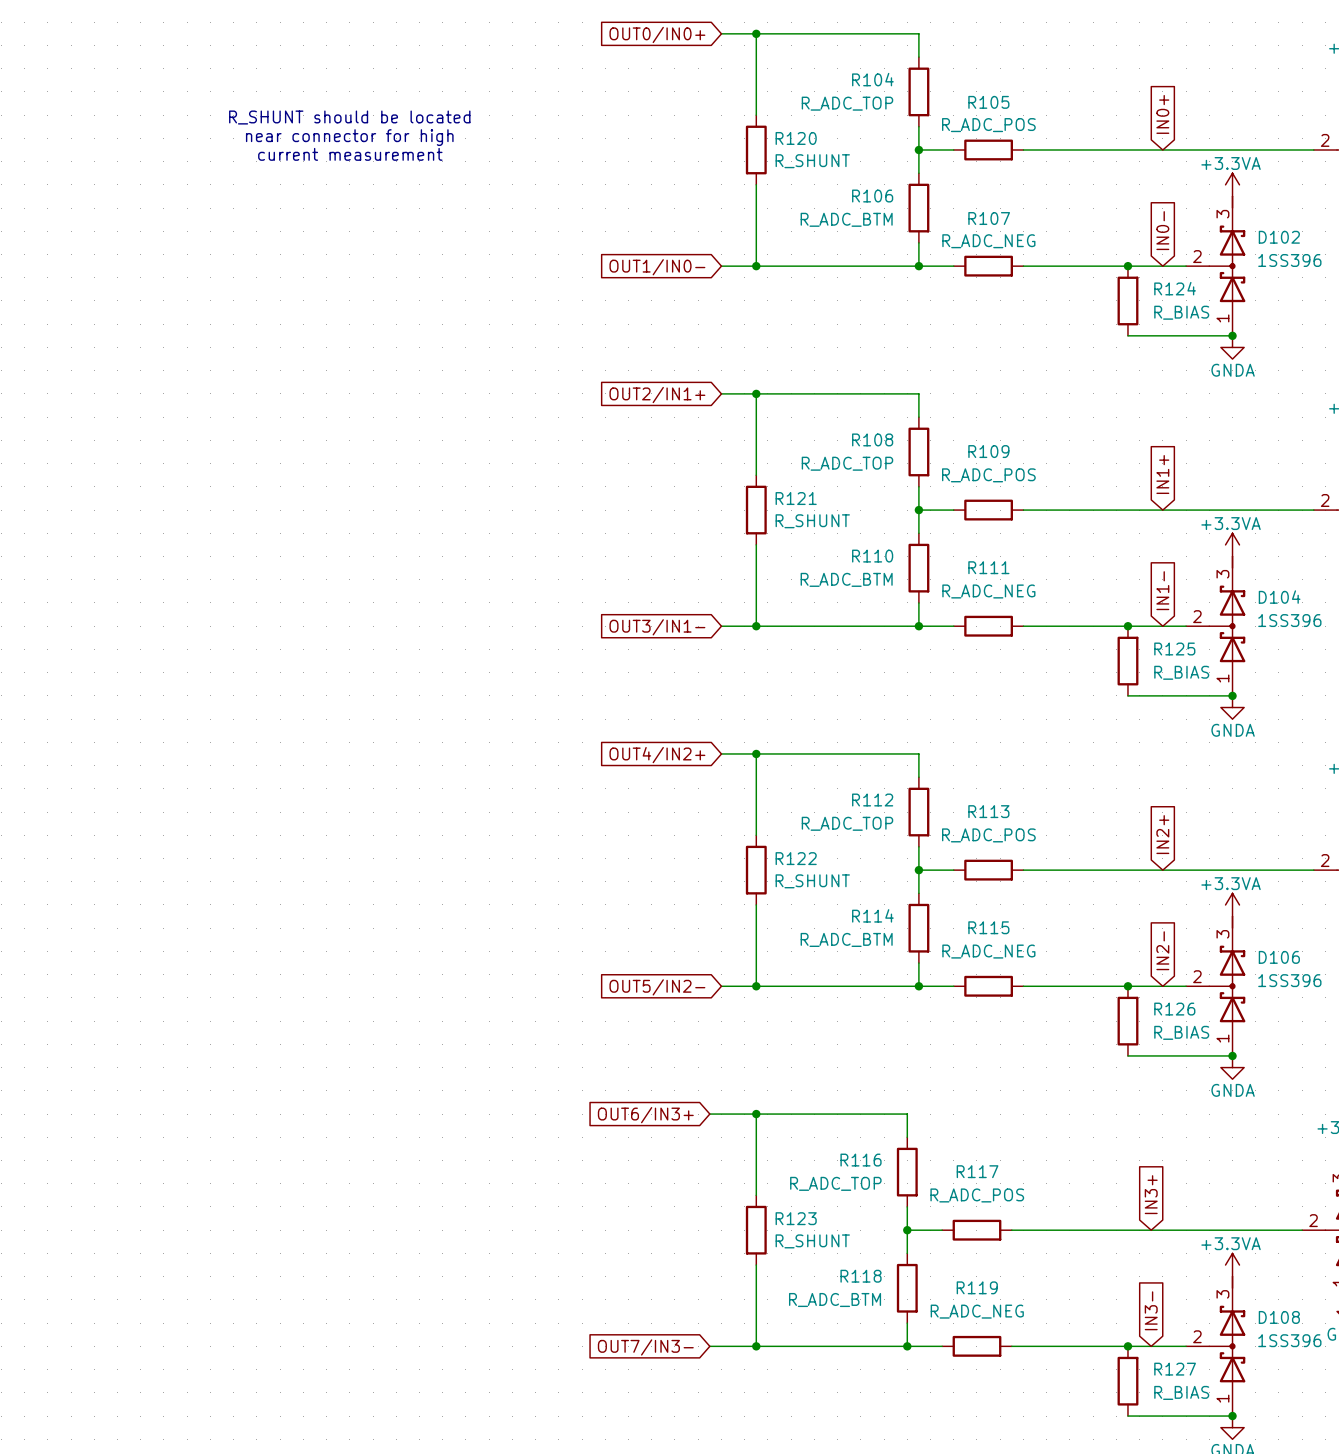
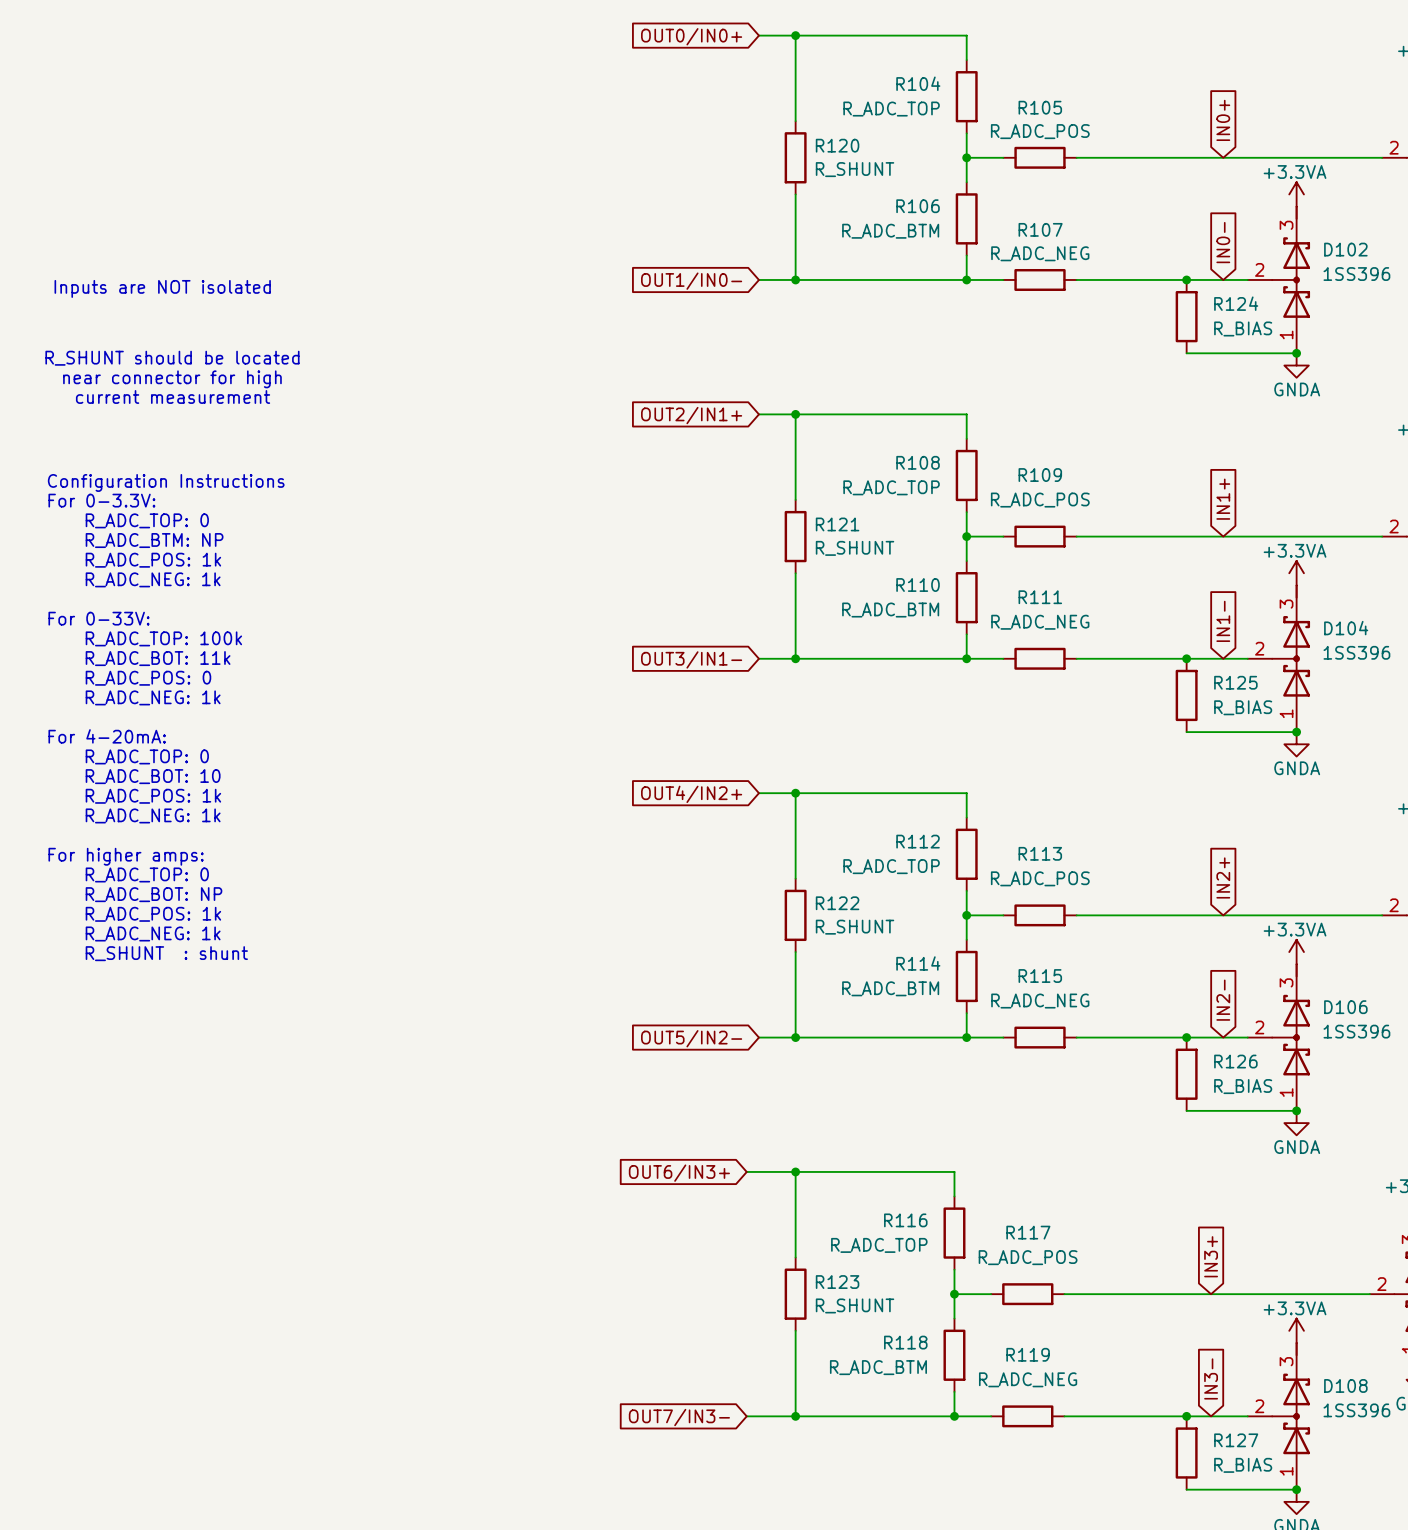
text: R_SHUNT should be located (349, 117) -> none
text: near connector for high (349, 137) -> none
text: current measurement (350, 154) -> none
text: none -> Inputs are NOT isolated (162, 288)
text: none -> R_SHUNT should be located (172, 358)
text: none -> near connector for high (172, 379)
text: none -> current measurement (173, 396)
text: none -> Configuration Instructions (166, 482)
text: none -> For 0-3.3V: (101, 500)
text: none -> R_ADC_TOP: 0 (147, 520)
text: none -> R_ADC_BTM: NP (154, 540)
text: none -> R_ADC_POS: 1k (153, 560)
text: none -> R_ADC_NEG: 1k (153, 579)
text: none -> For 0-33V: (99, 618)
text: none -> R_ADC_TOP: 100k (163, 638)
text: none -> R_ADC_BOT: 11k (158, 658)
text: none -> R_ADC_POS: 0 (148, 678)
text: none -> R_ADC_NEG: 1k (153, 697)
text: none -> For 4-20mA: (107, 736)
text: none -> R_ADC_TOP: 0 (147, 756)
text: none -> R_ADC_BOT: 10 (153, 776)
text: none -> R_ADC_POS: 1k (153, 796)
text: none -> R_ADC_NEG: 1k (153, 815)
text: none -> For higher amps: (126, 856)
text: none -> R_ADC_TOP: 0 (147, 874)
text: none -> R_ADC_BOT: NP (153, 894)
text: none -> R_ADC_POS: 1k (153, 914)
text: none -> R_ADC_NEG: 1k (153, 933)
text: none -> R_SHUNT : shunt (166, 953)

